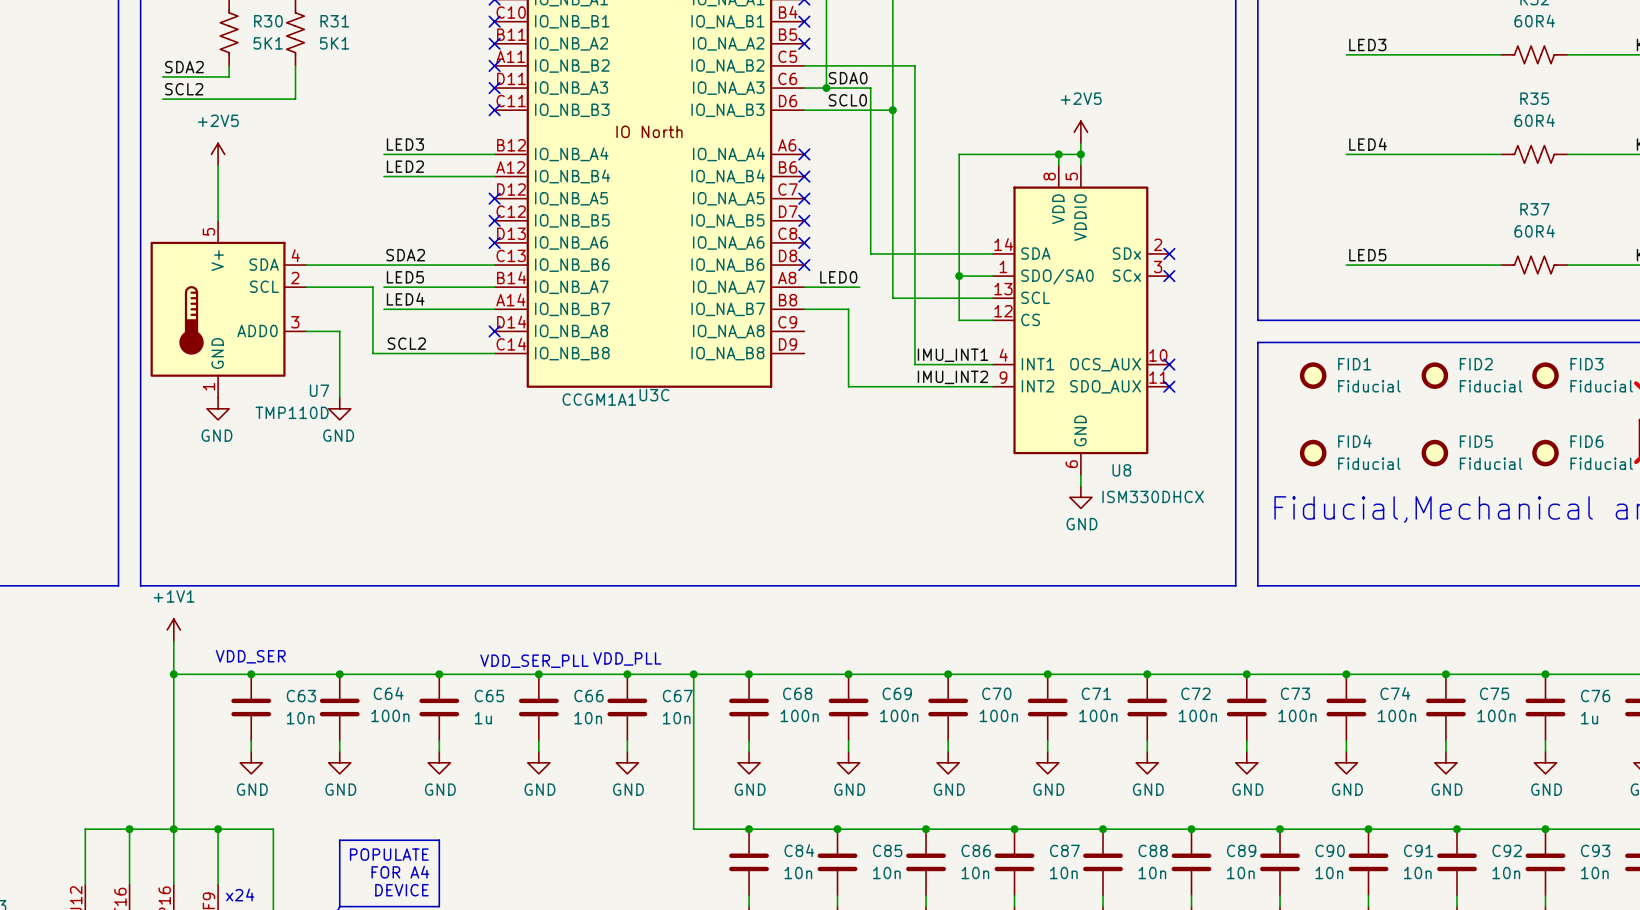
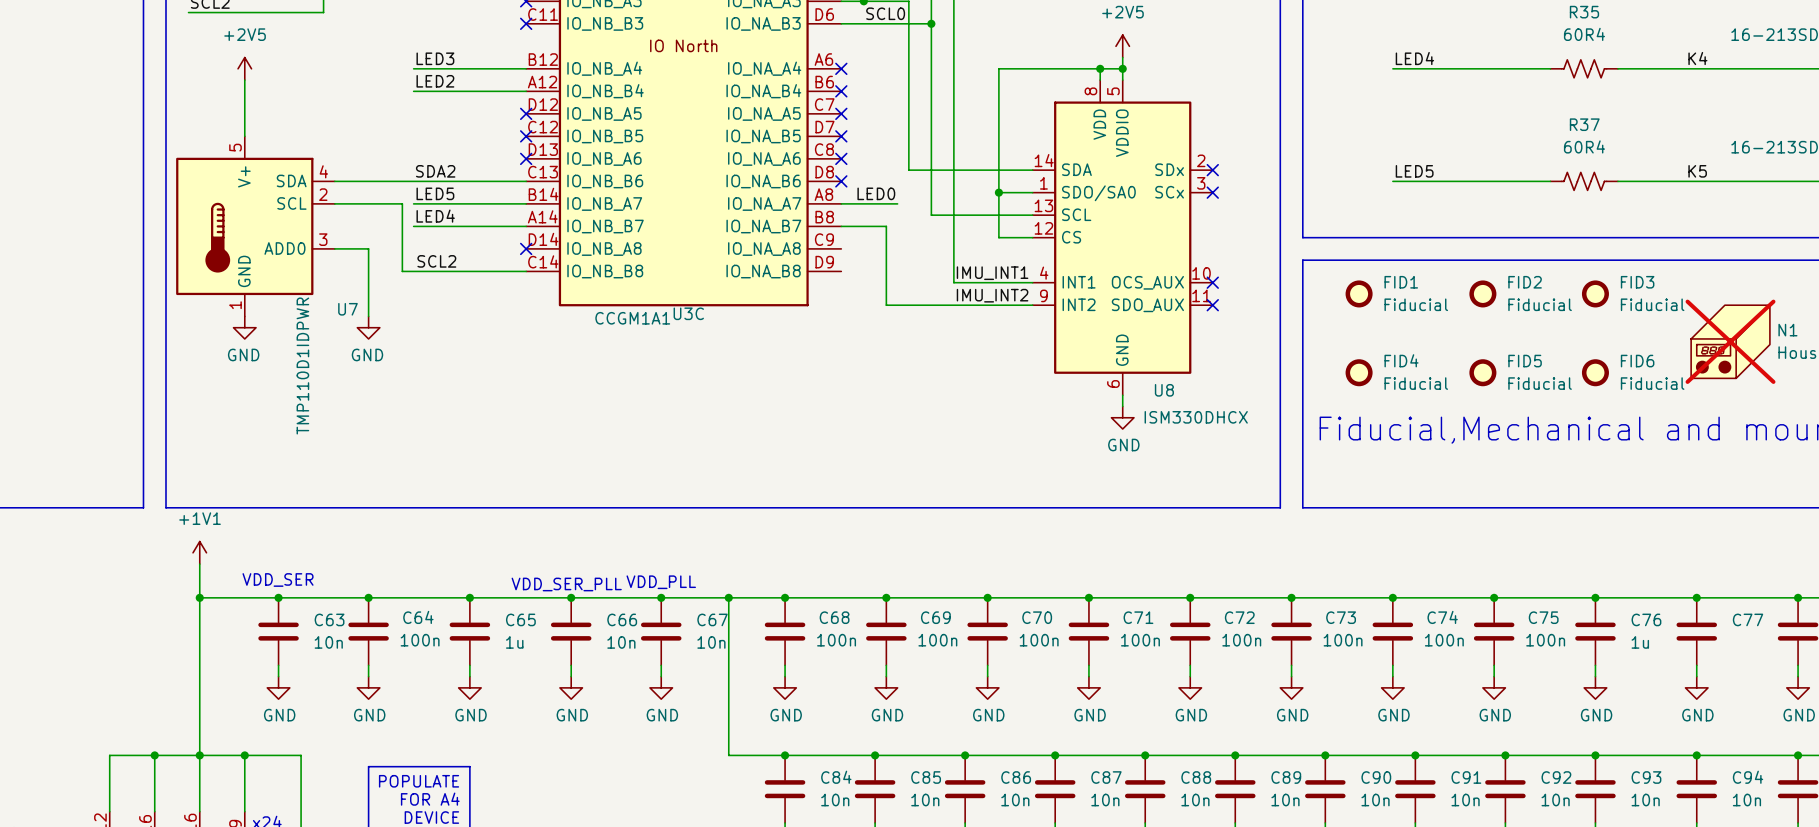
U7 value: TMP110D (292, 412) -> TMP110D1IDPWR (302, 366)

